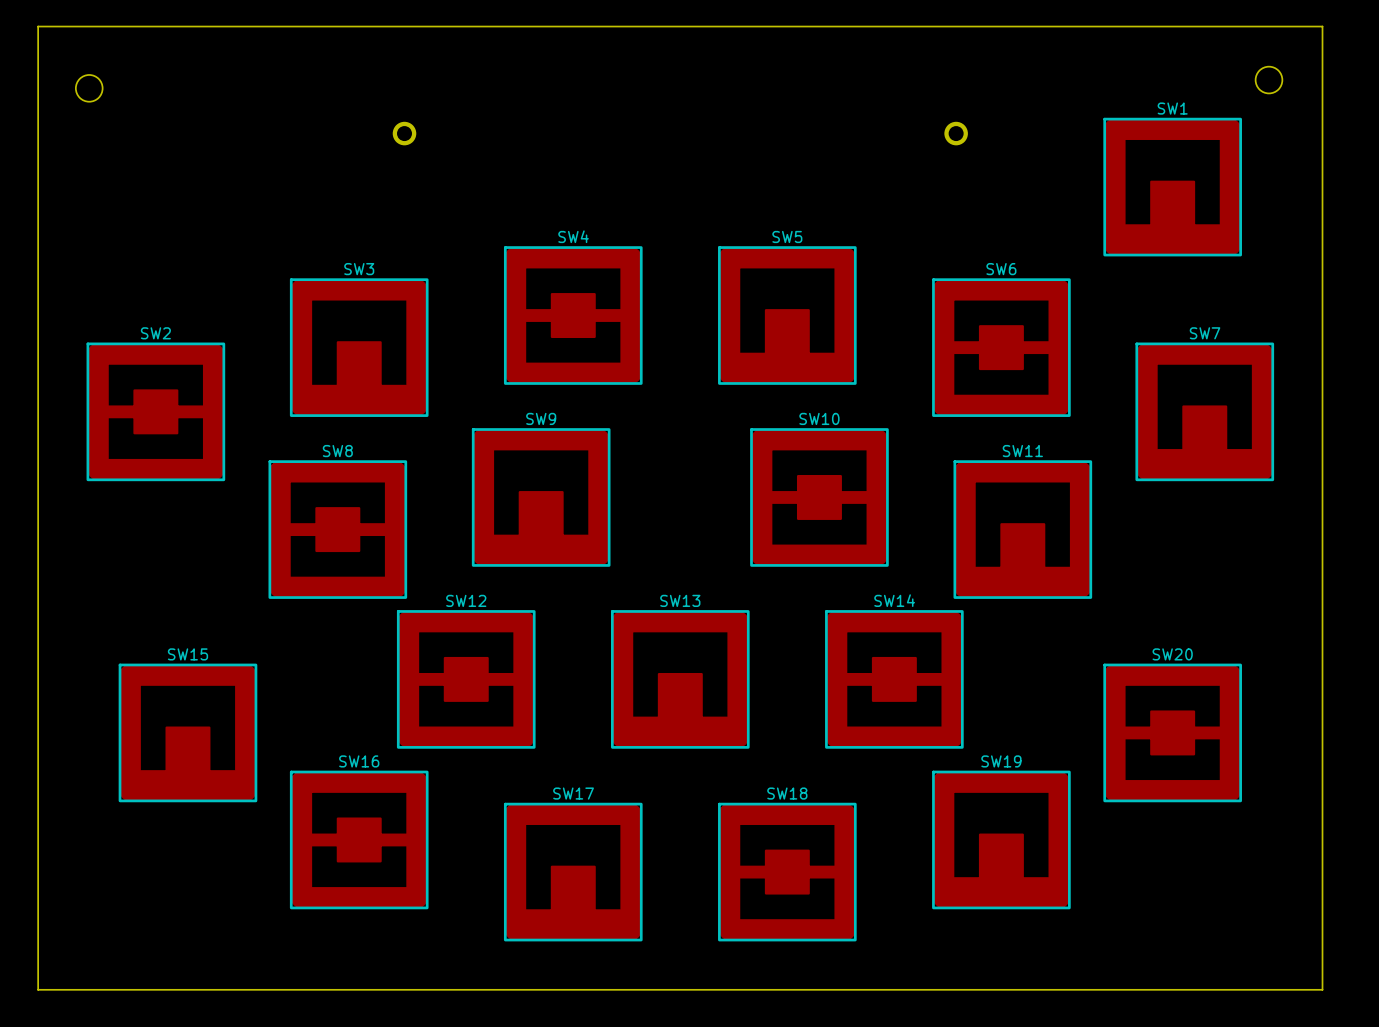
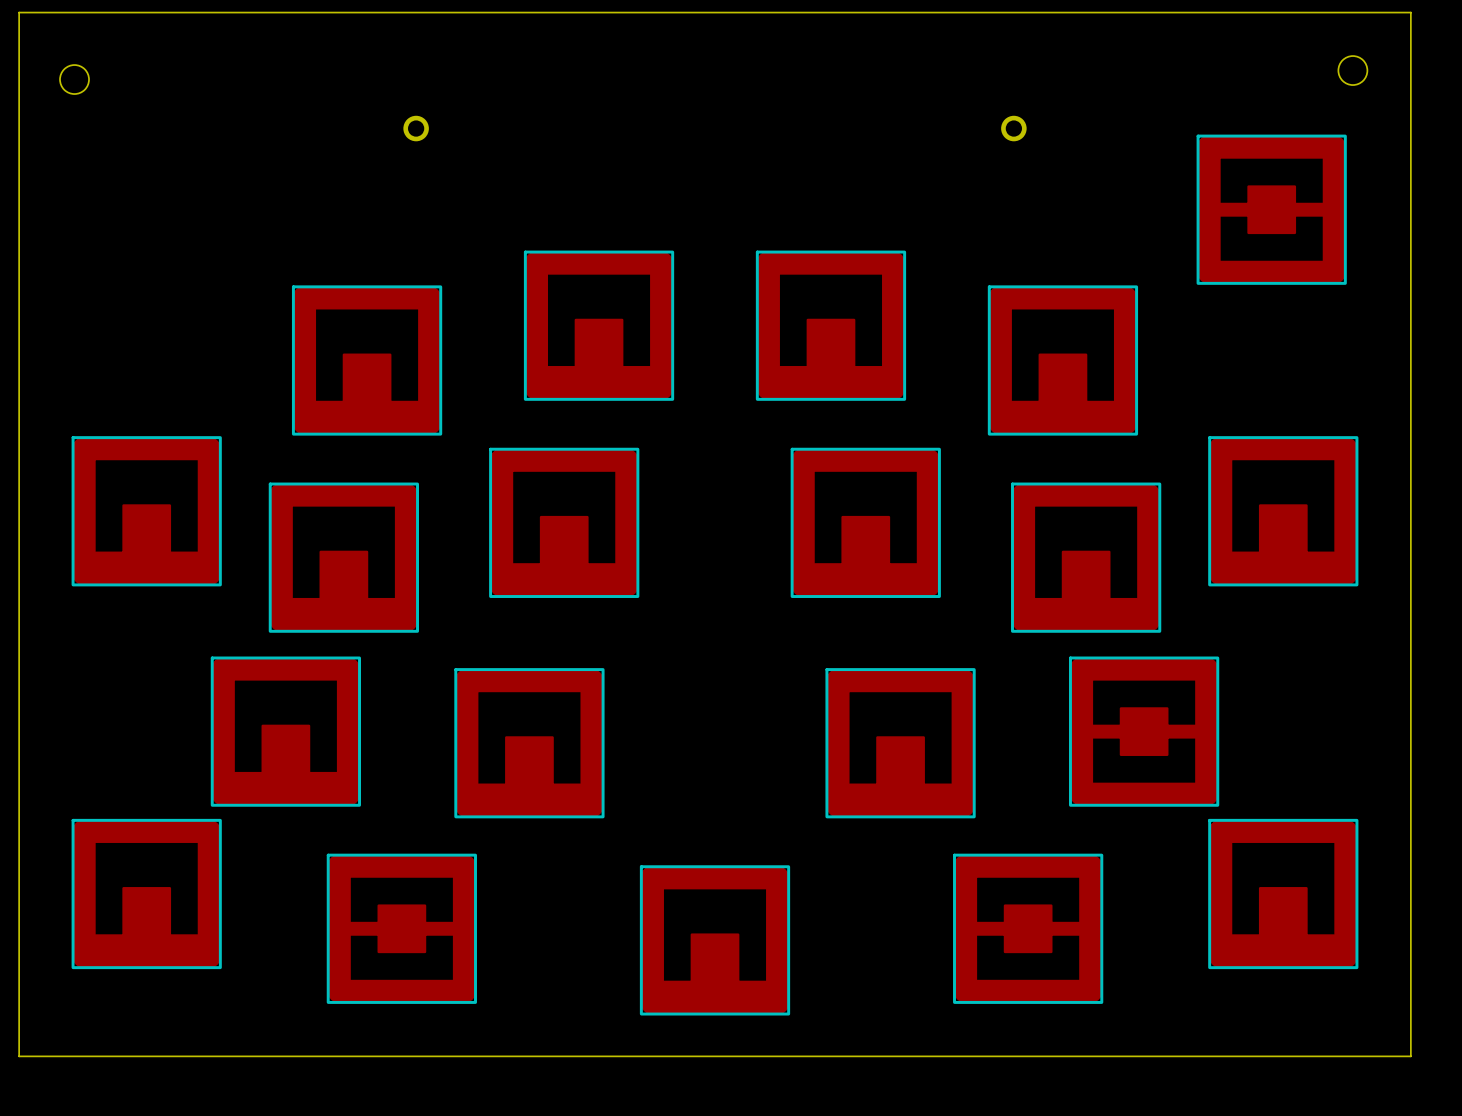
SW1: (1172, 187) -> none
part: none -> (1271, 209)
SW5 name: SW5 (787, 236) -> none
SW3 name: SW3 (359, 269) -> none
SW4: (573, 315) -> none
part: none -> (599, 325)
SW6: (1001, 347) -> none
part: none -> (1062, 360)
SW2: (155, 411) -> none
SW7: (1204, 411) -> none
SW9 name: SW9 (541, 418) -> none
SW11 name: SW11 (1022, 451) -> none
part: none -> (146, 511)
part: none -> (1283, 511)
SW10: (819, 497) -> none
part: none -> (865, 522)
SW8: (337, 529) -> none
part: none -> (343, 557)
SW12: (466, 679) -> none
SW13: (680, 679) -> none
SW14: (894, 679) -> none
part: none -> (285, 731)
part: none -> (1144, 731)
part: none -> (529, 743)
part: none -> (900, 743)
SW15: (187, 732) -> none
SW20: (1172, 732) -> none
part: none -> (146, 894)
SW16: (359, 839) -> none
SW19: (1001, 839) -> none
part: none -> (1283, 894)
part: none -> (401, 928)
SW17: (573, 872) -> none
SW18: (787, 872) -> none
part: none -> (1028, 928)
part: none -> (715, 940)

